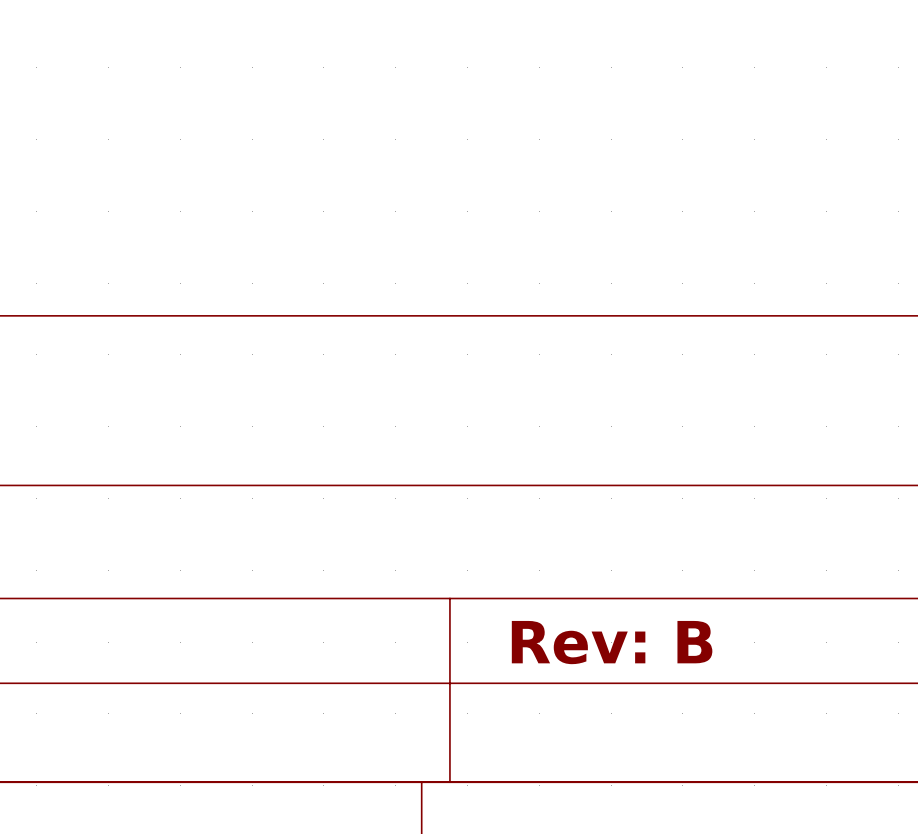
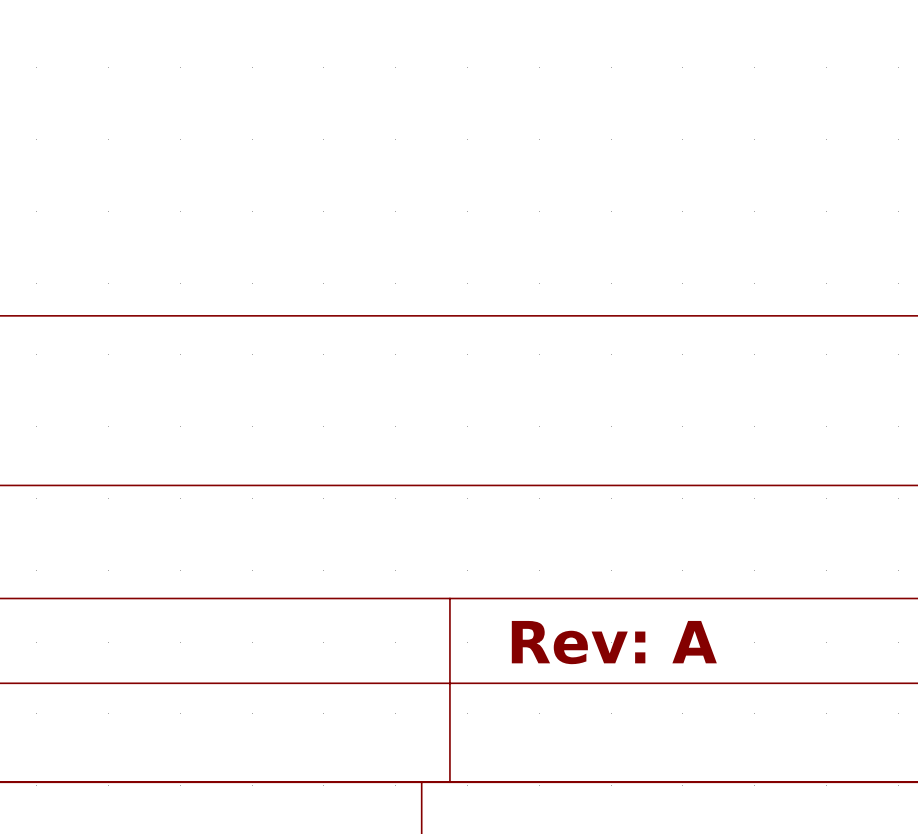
title block: Rev: B (612, 642) -> Rev: A (614, 642)

